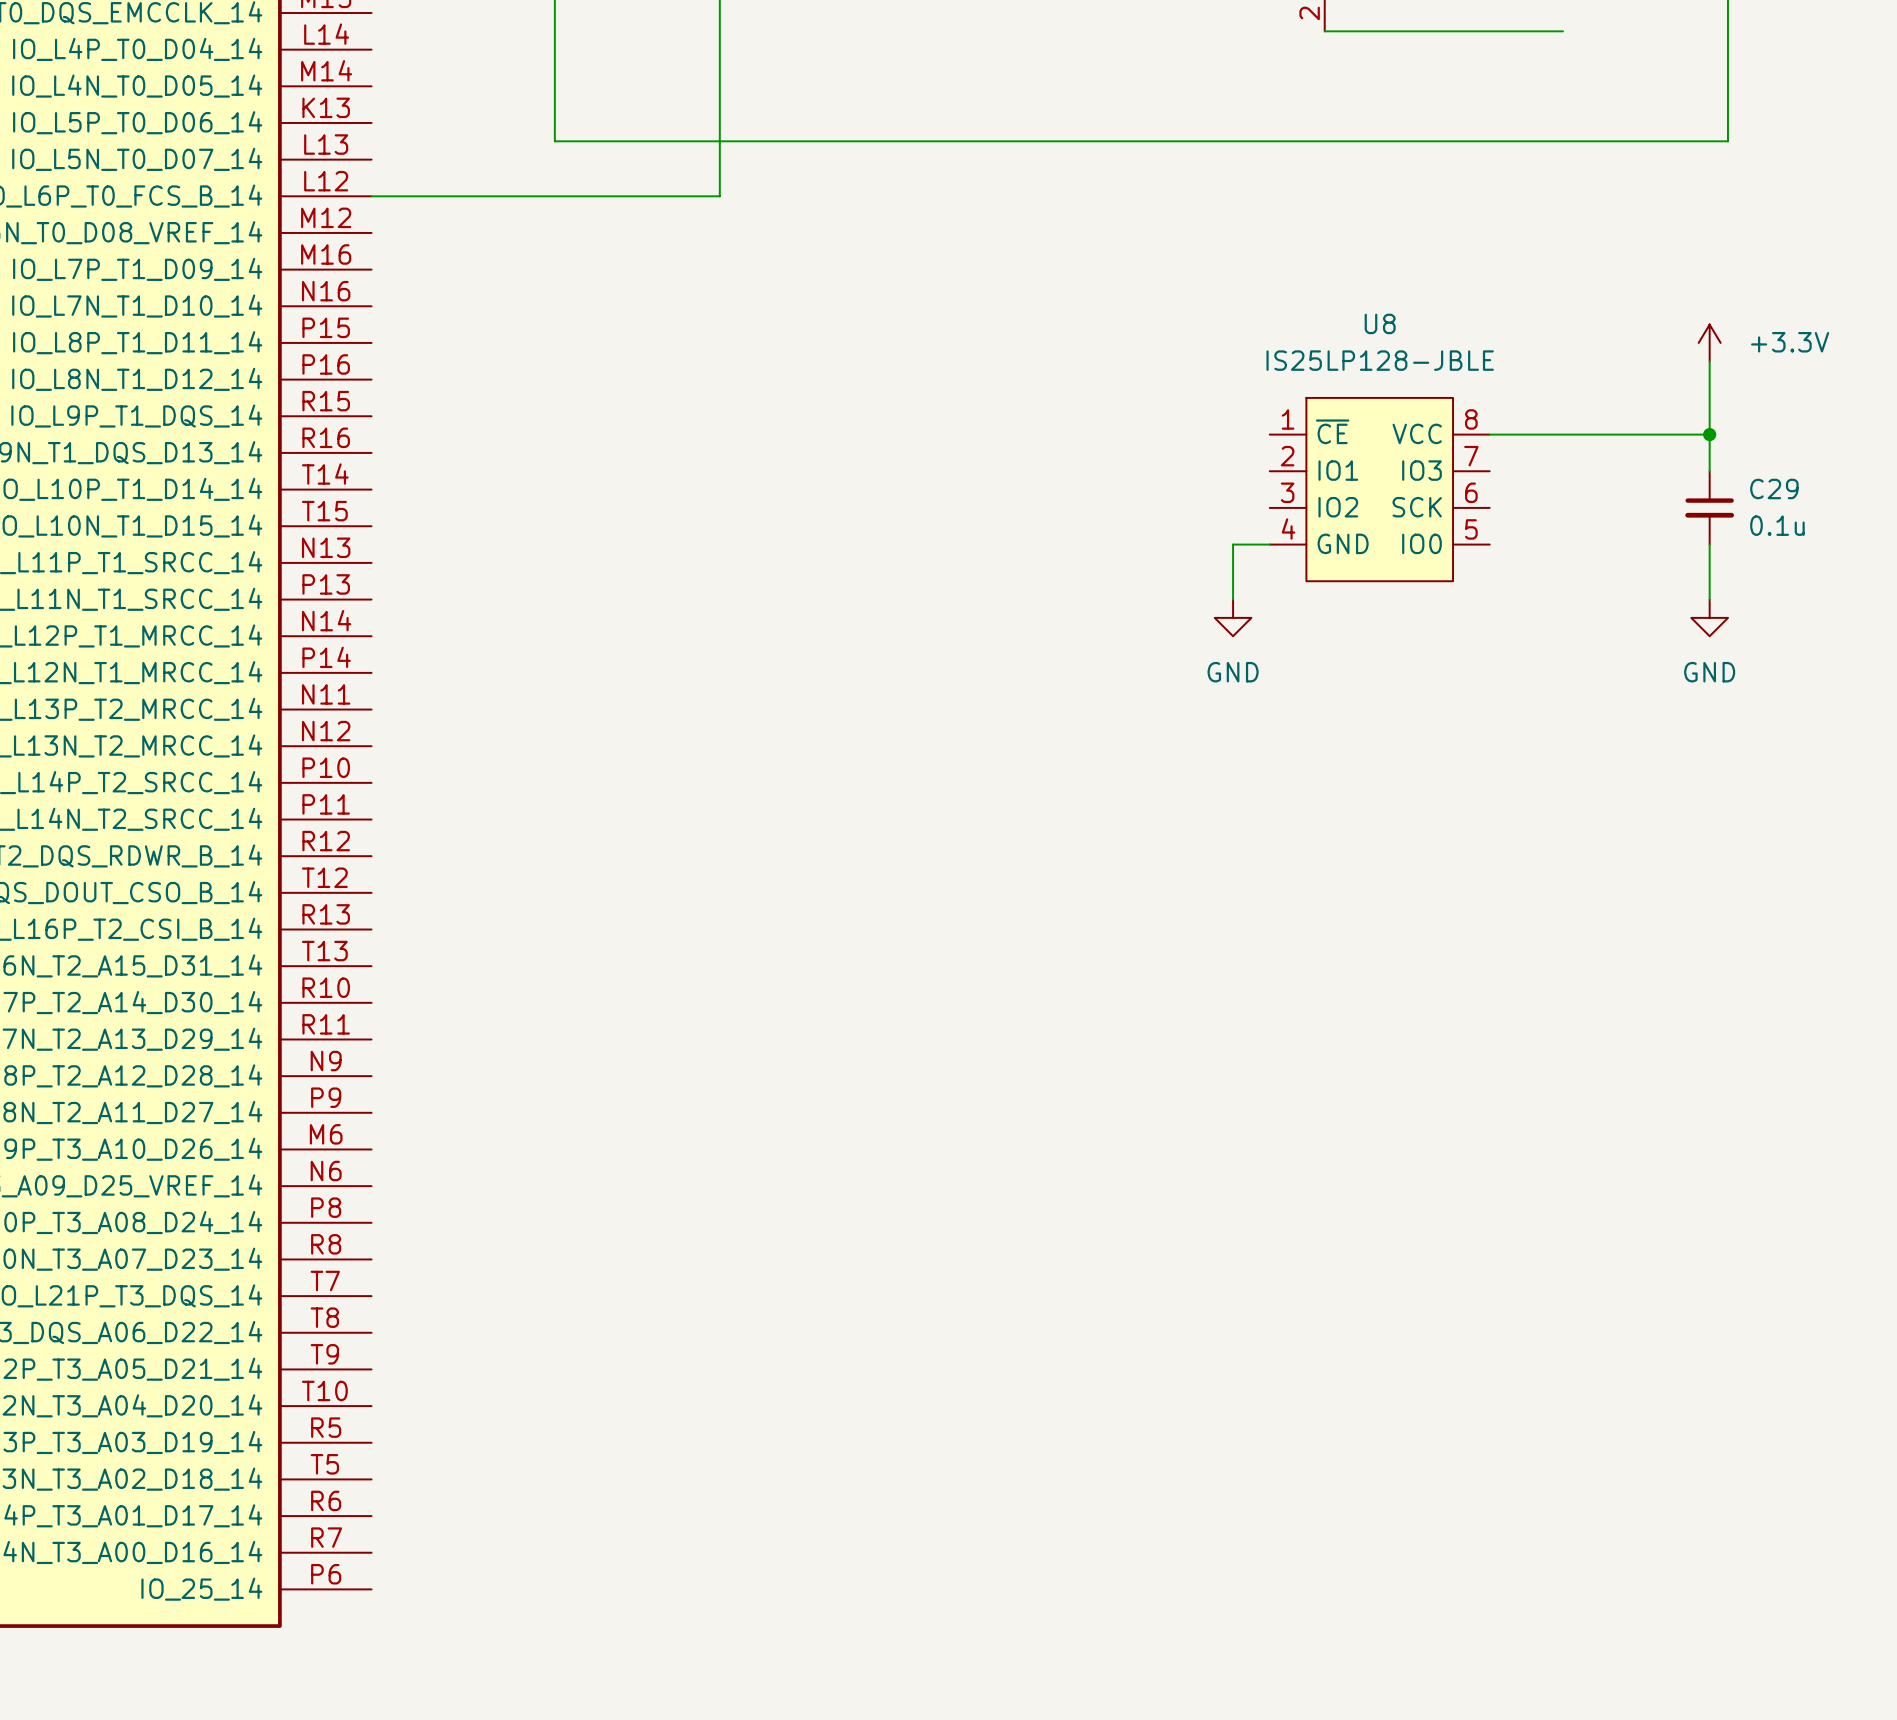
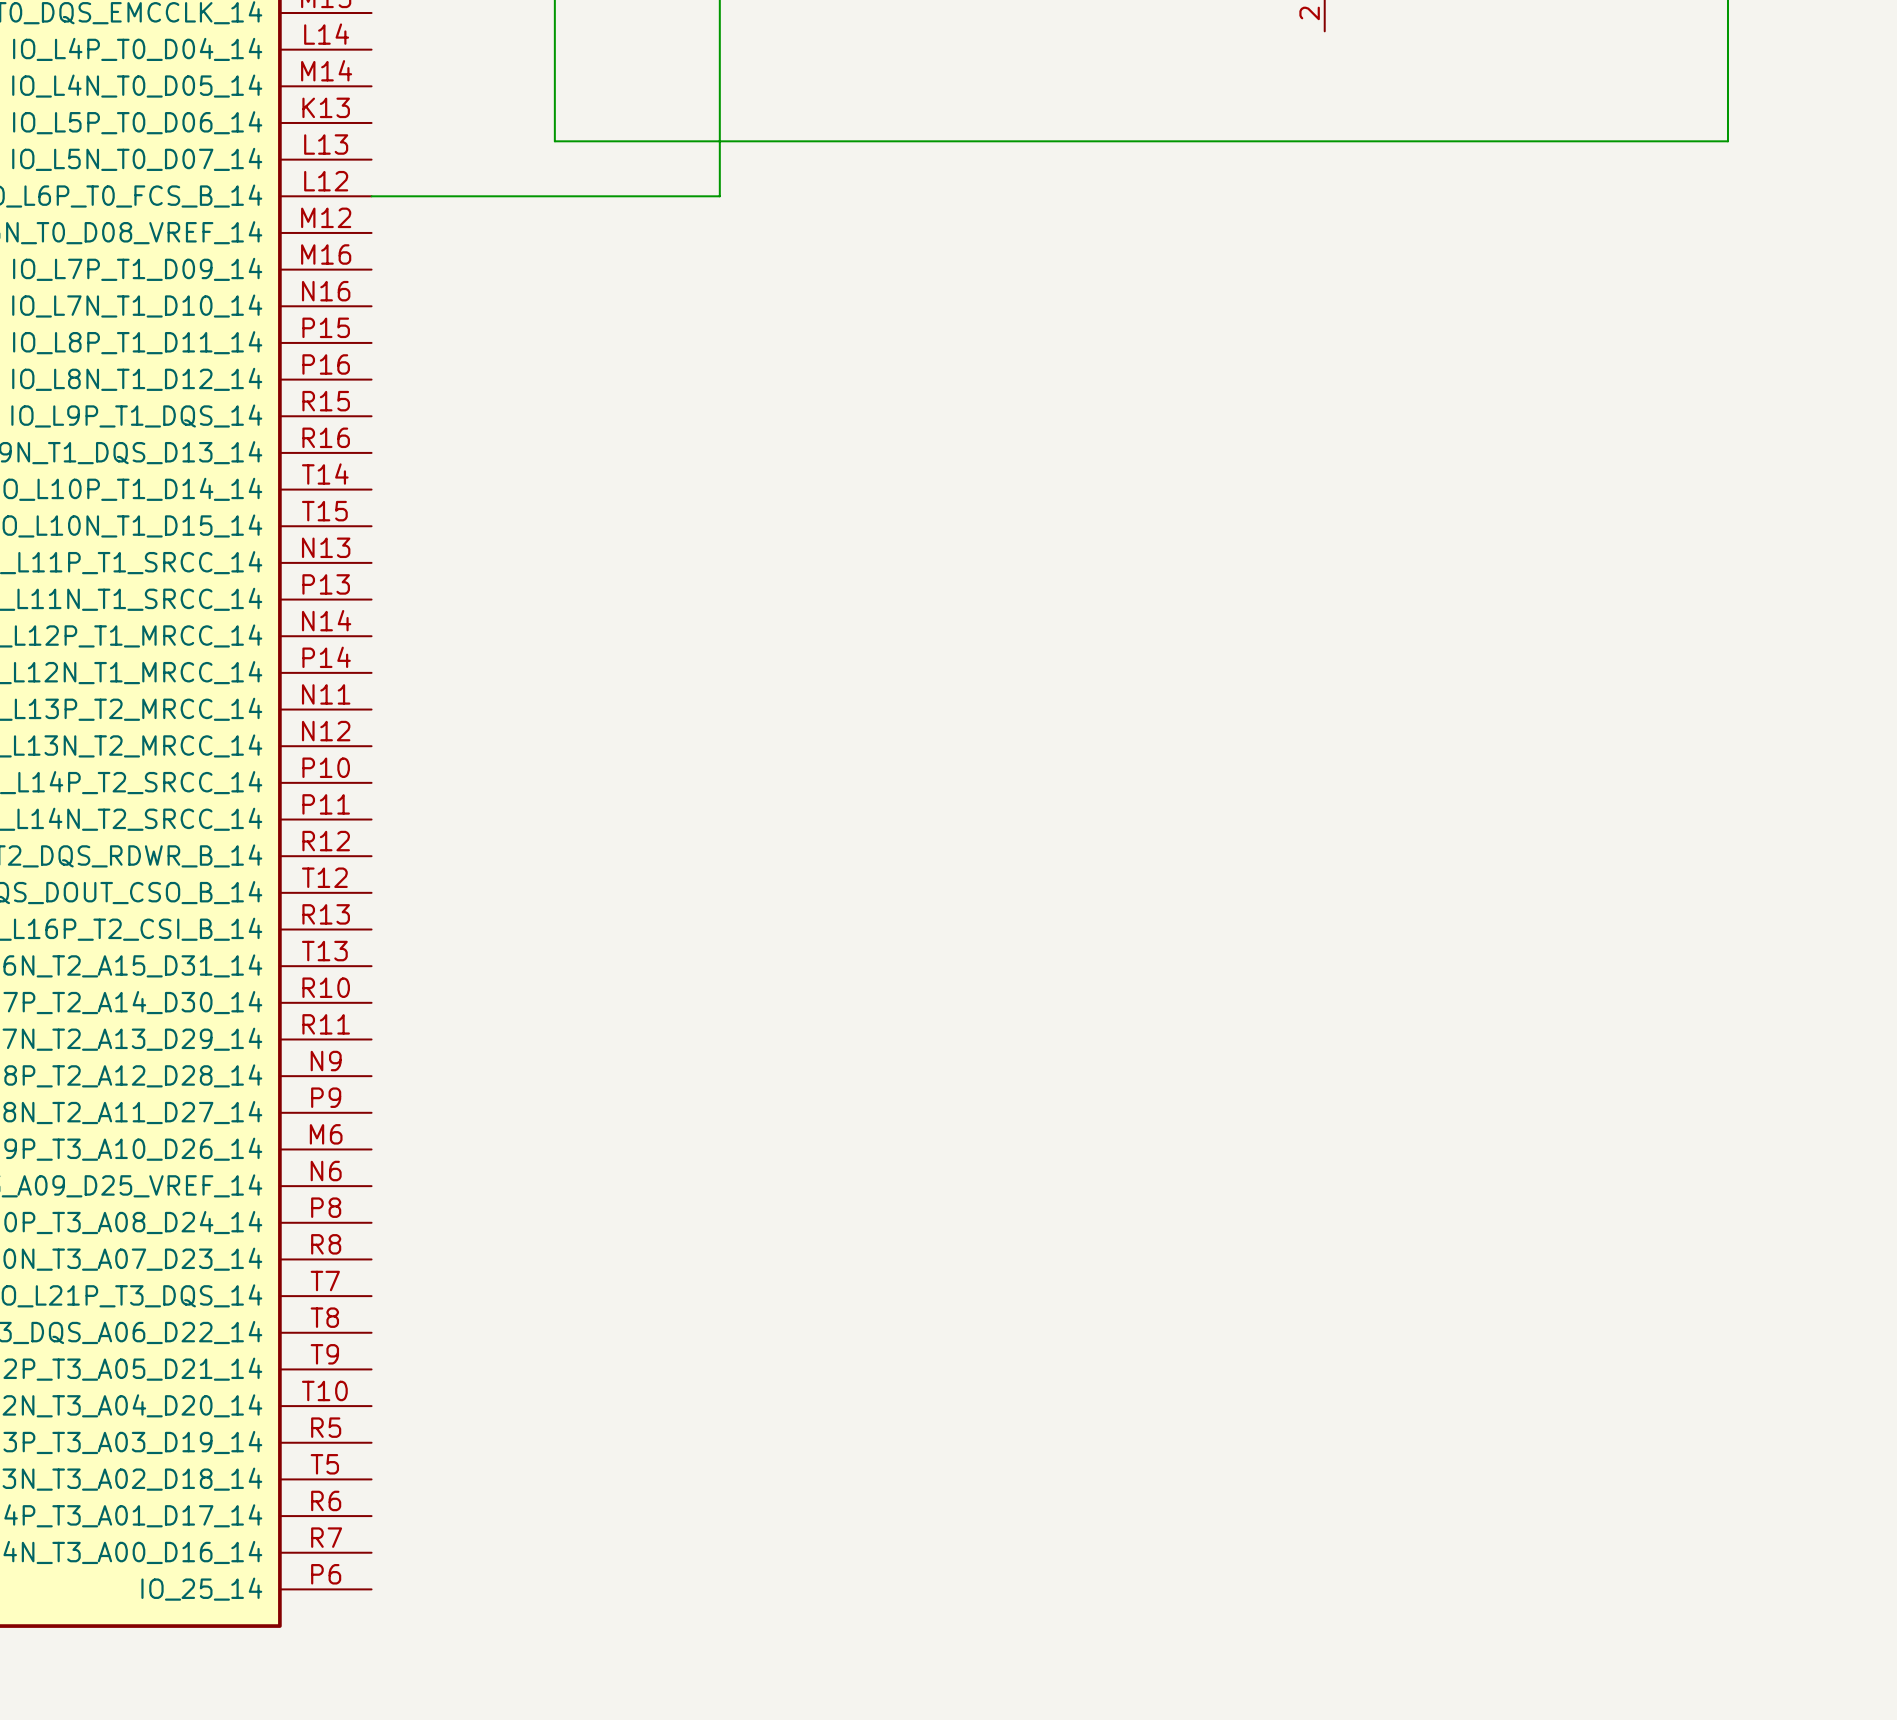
wire: (1324, 31) (1563, 31) -> none
power symbol: +3.3V (1709, 342) -> none
wire: (1709, 361) (1709, 471) -> none
wire: (1489, 434) (1709, 434) -> none
junction: (1709, 434) -> none
U8: IS25LP128-JBLE (1379, 489) -> none
C29: 0.1u (1709, 507) -> none
wire: (1269, 544) (1233, 544) (1233, 599) -> none
wire: (1709, 544) (1709, 599) -> none
power symbol: GND (1233, 617) -> none
power symbol: GND (1709, 617) -> none

